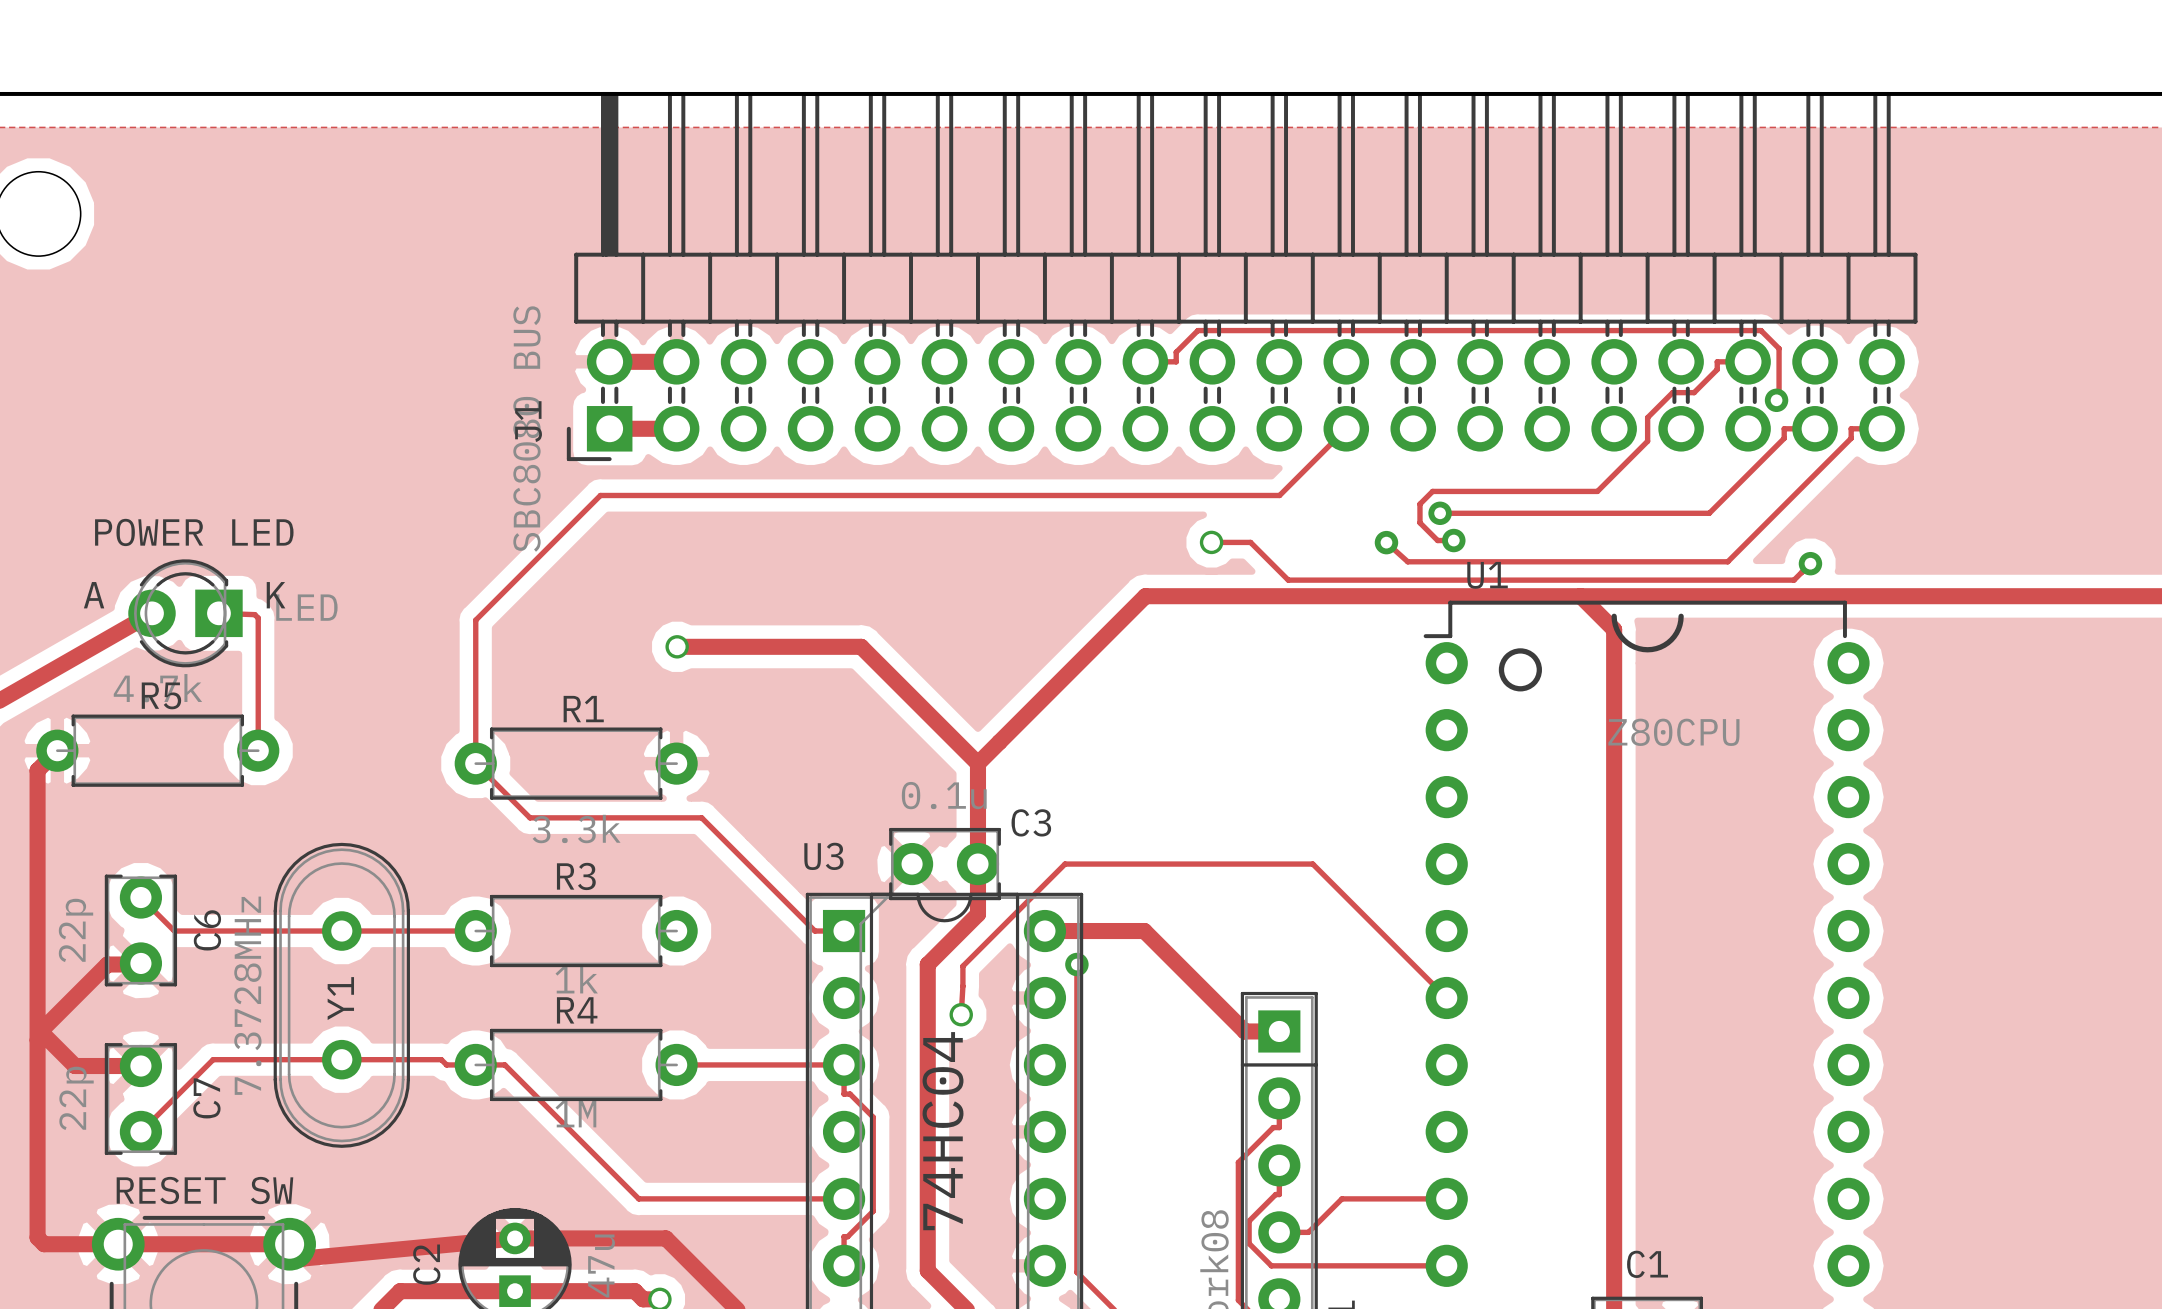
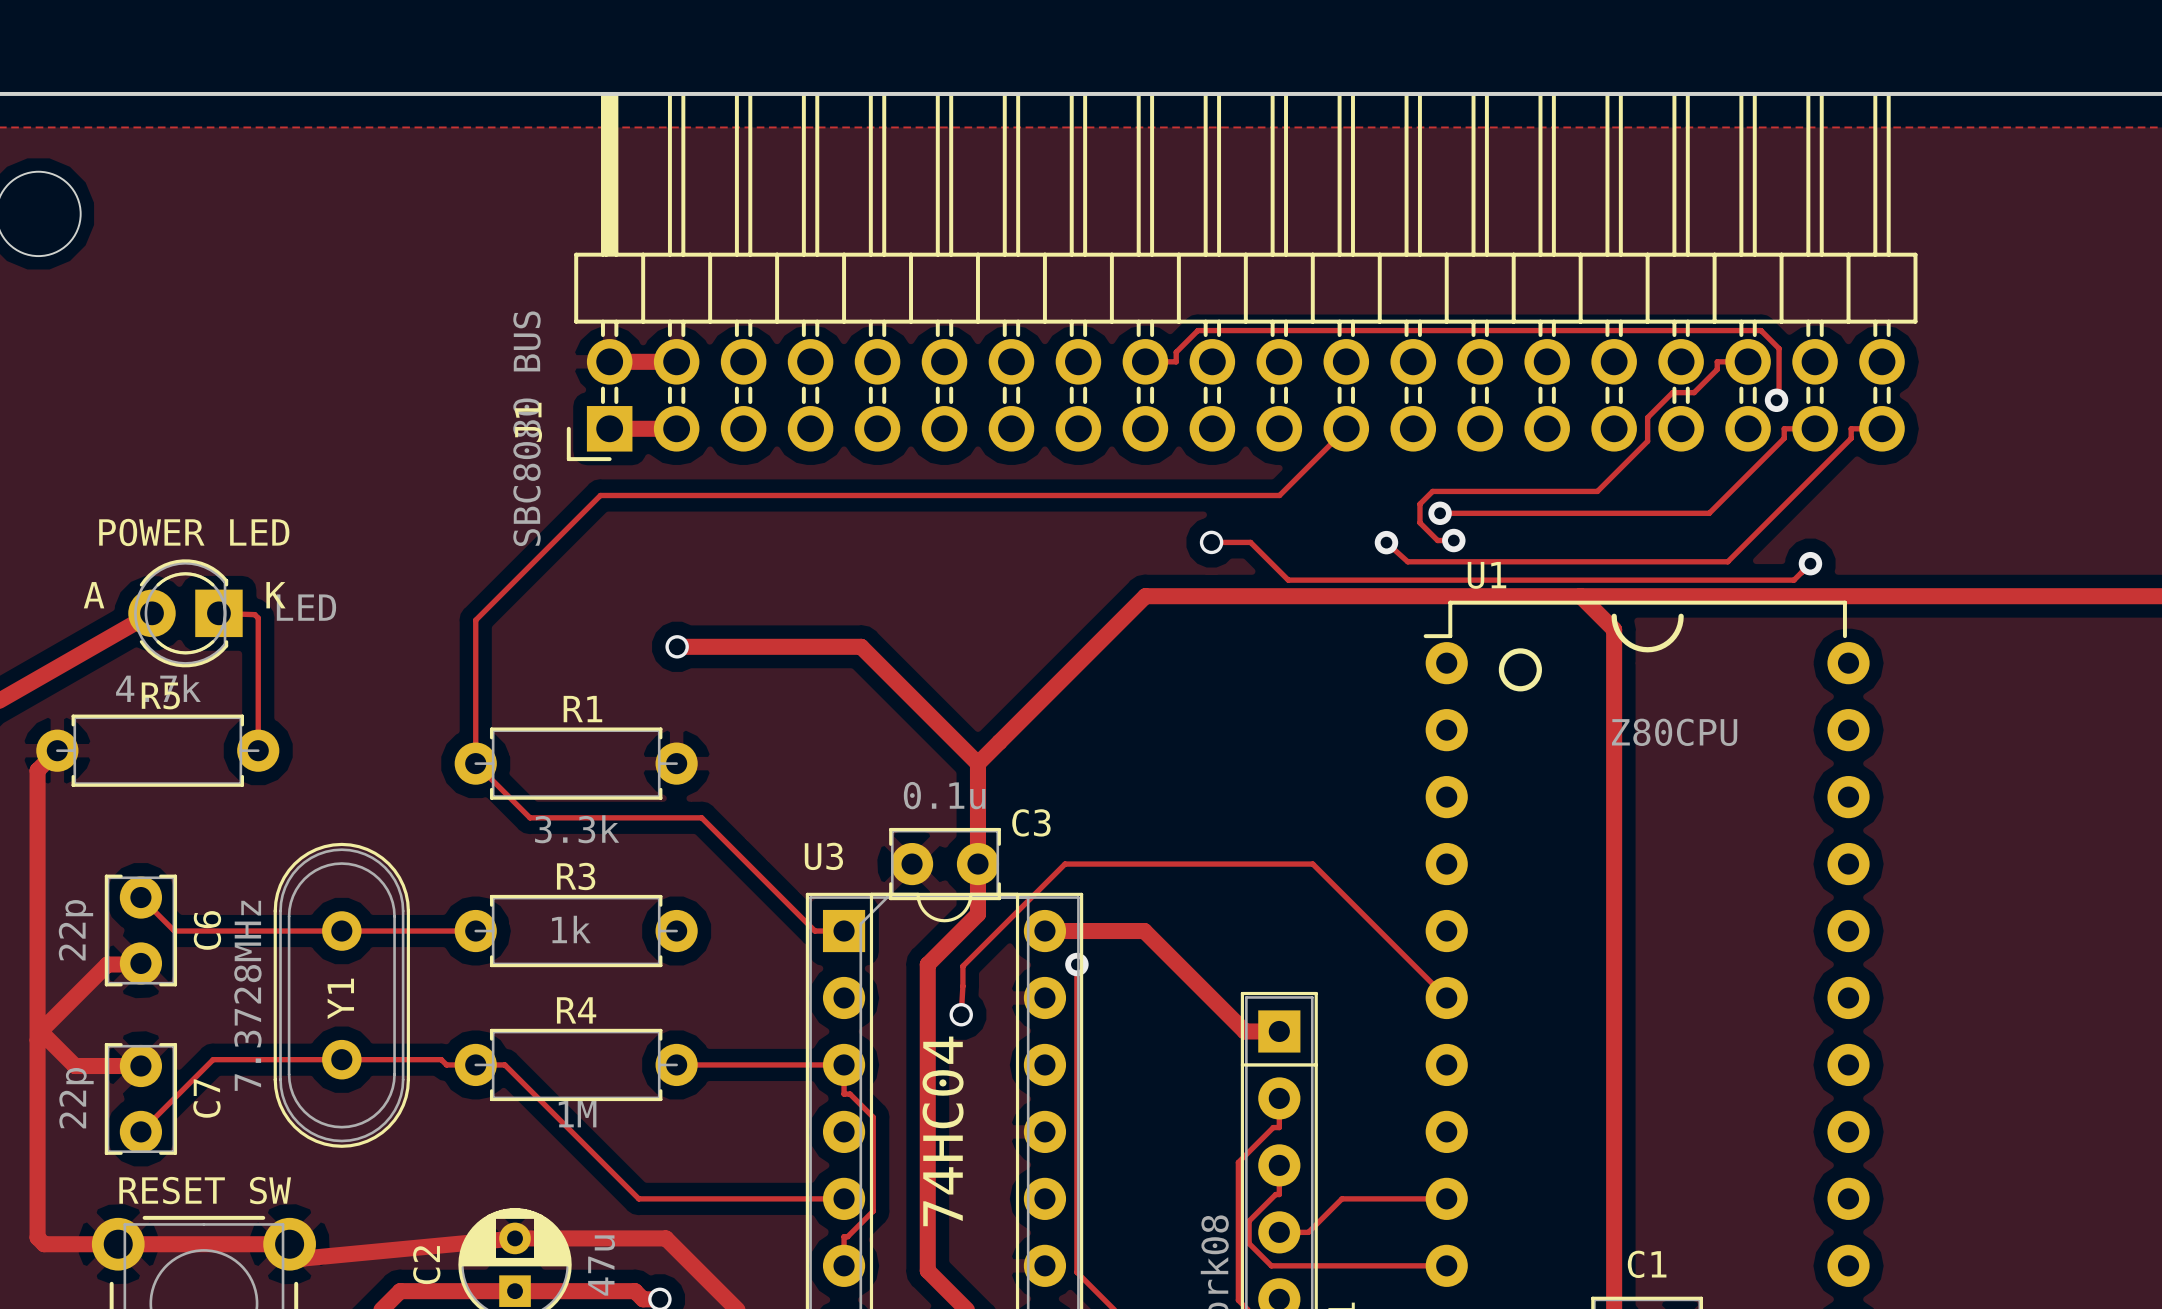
R3 value position: 1k (576, 979) -> 1k (571, 929)

